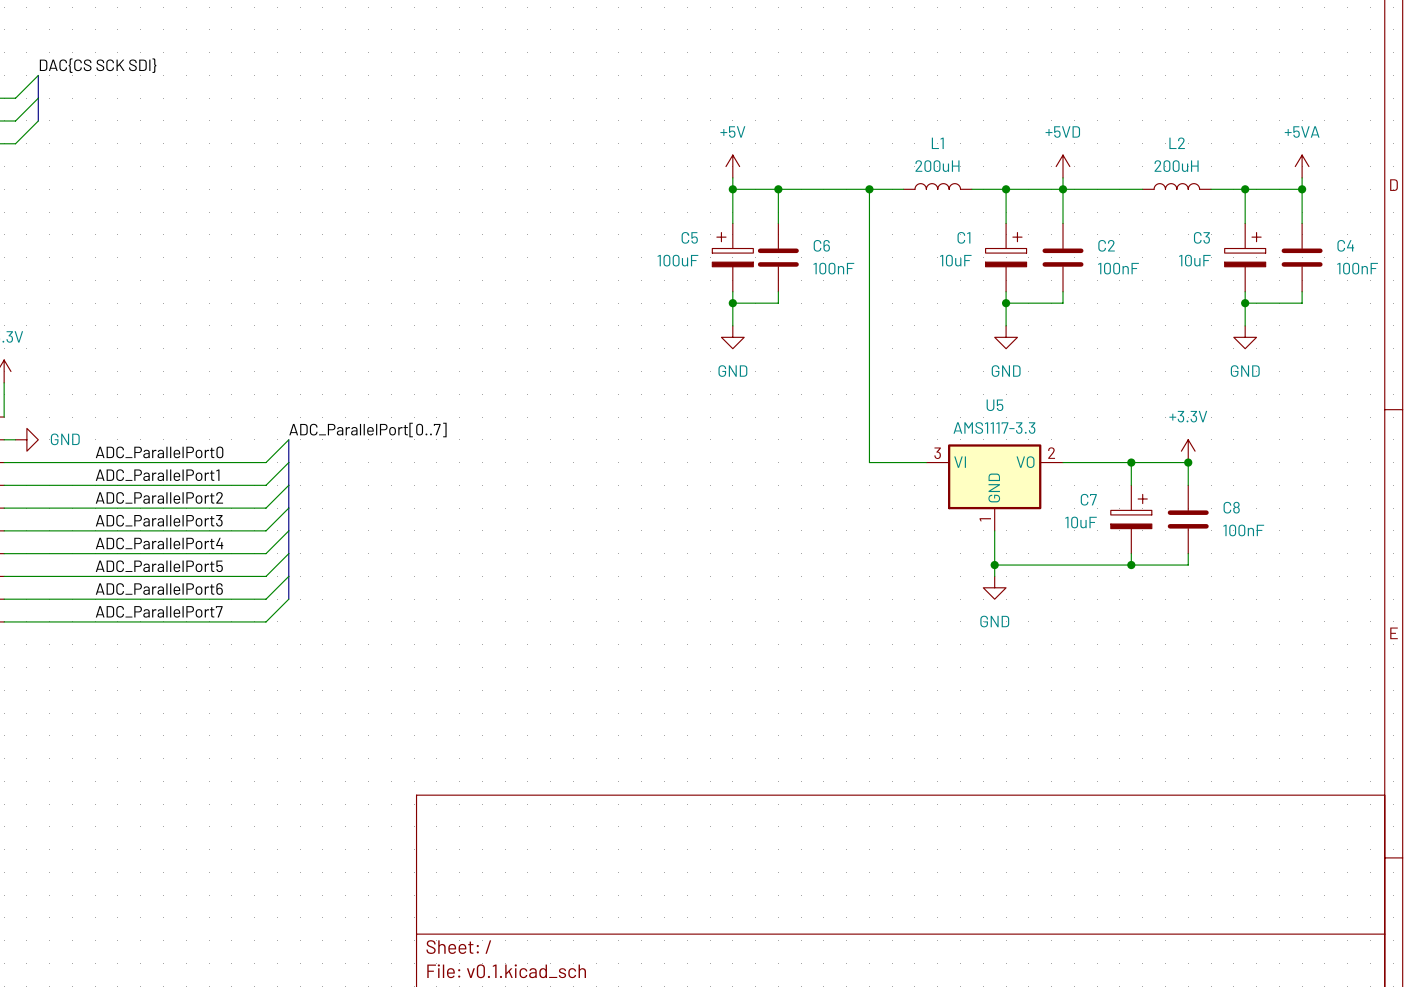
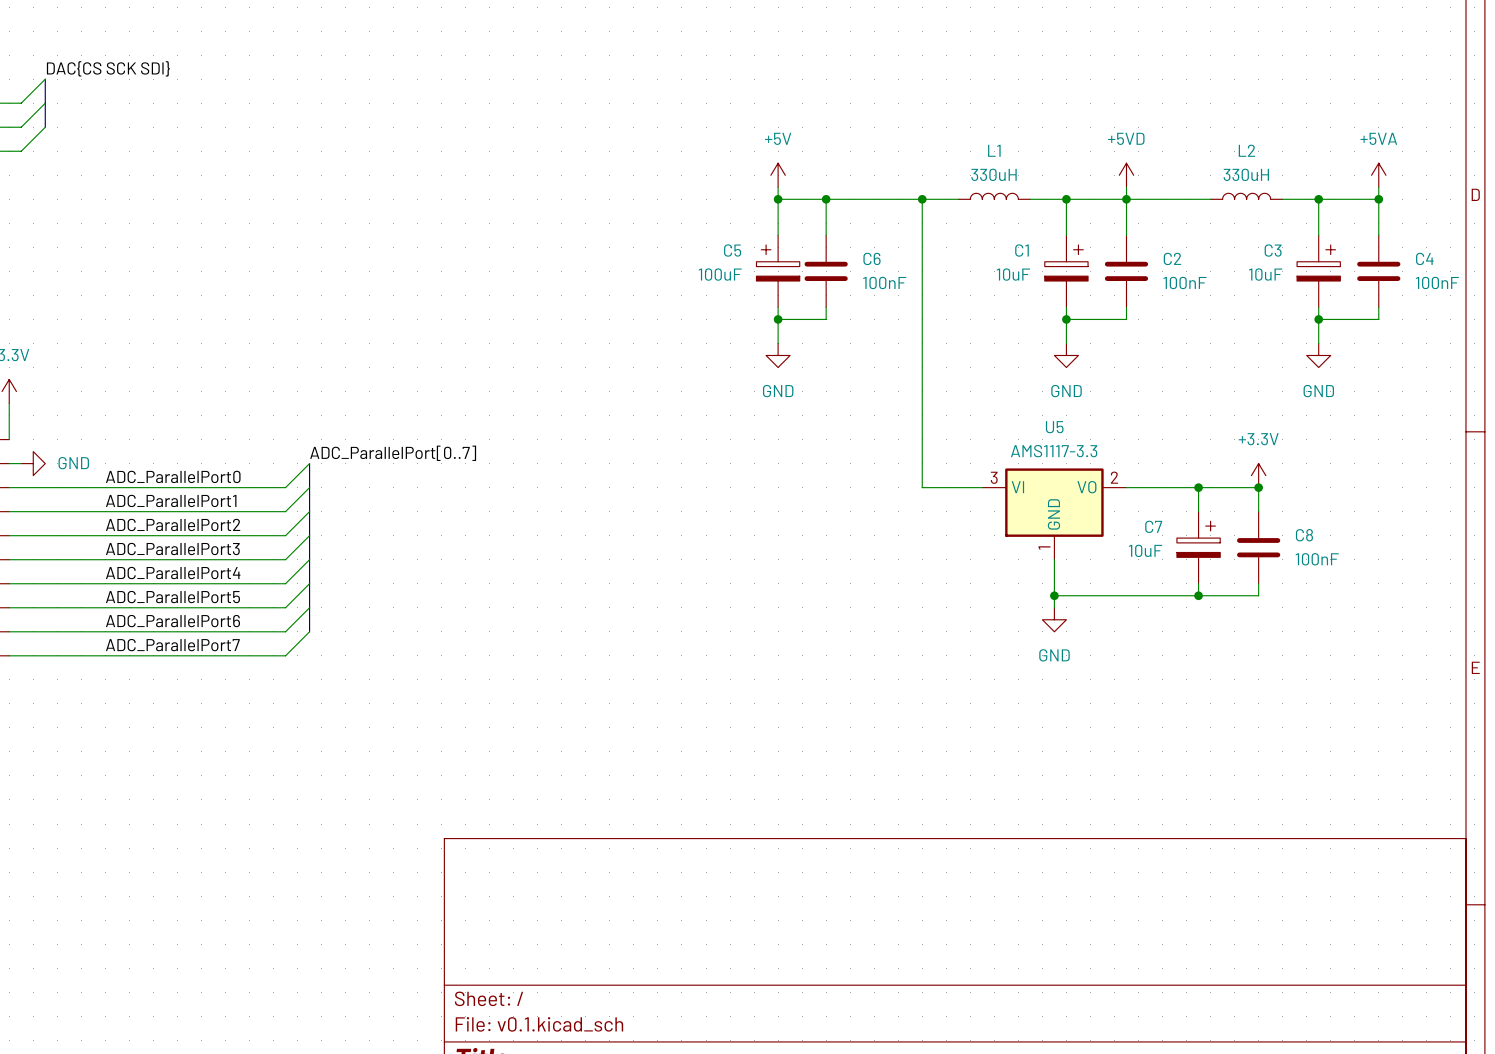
L1 value: 200uH (937, 166) -> 330uH (993, 174)
L2 value: 200uH (1176, 166) -> 330uH (1246, 174)

